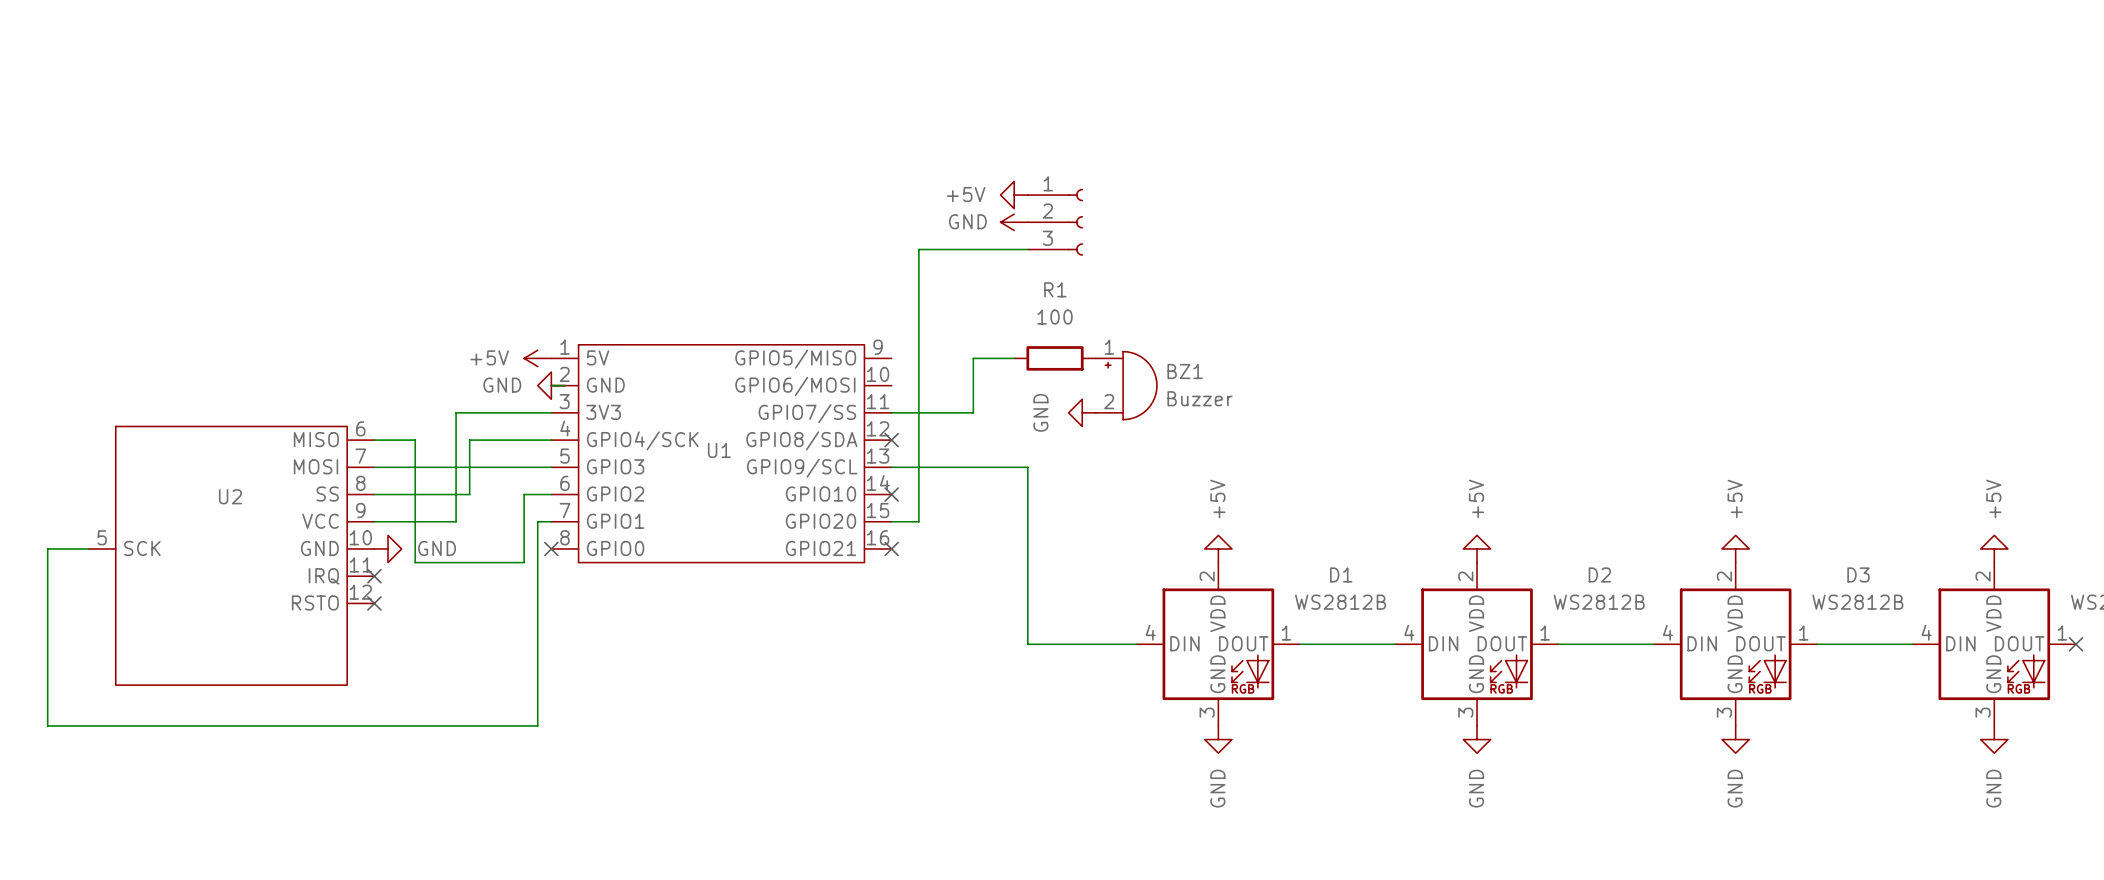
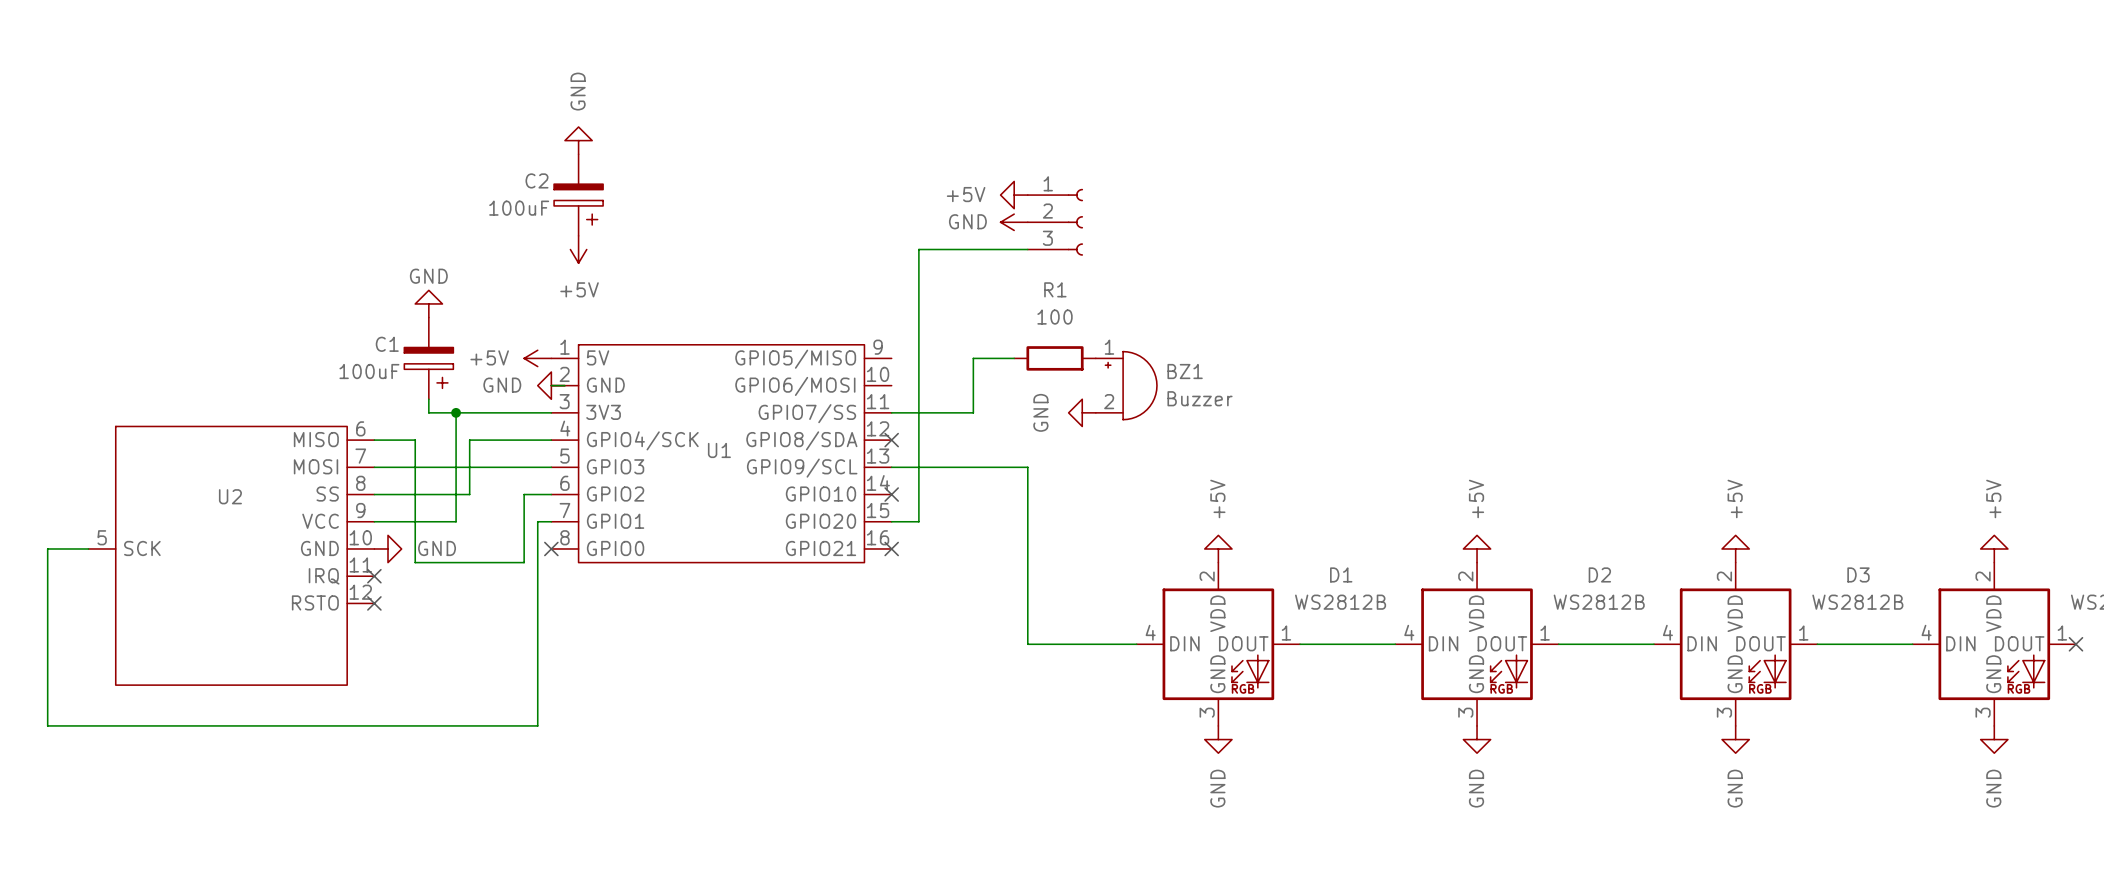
power symbol: none -> GND (578, 140)
C2: none -> 100uF (578, 195)
power symbol: none -> +5V (578, 249)
power symbol: none -> GND (428, 303)
C1: none -> 100uF (428, 358)
wire: none -> (428, 399) (428, 412) (456, 412)
junction: none -> (456, 412)

